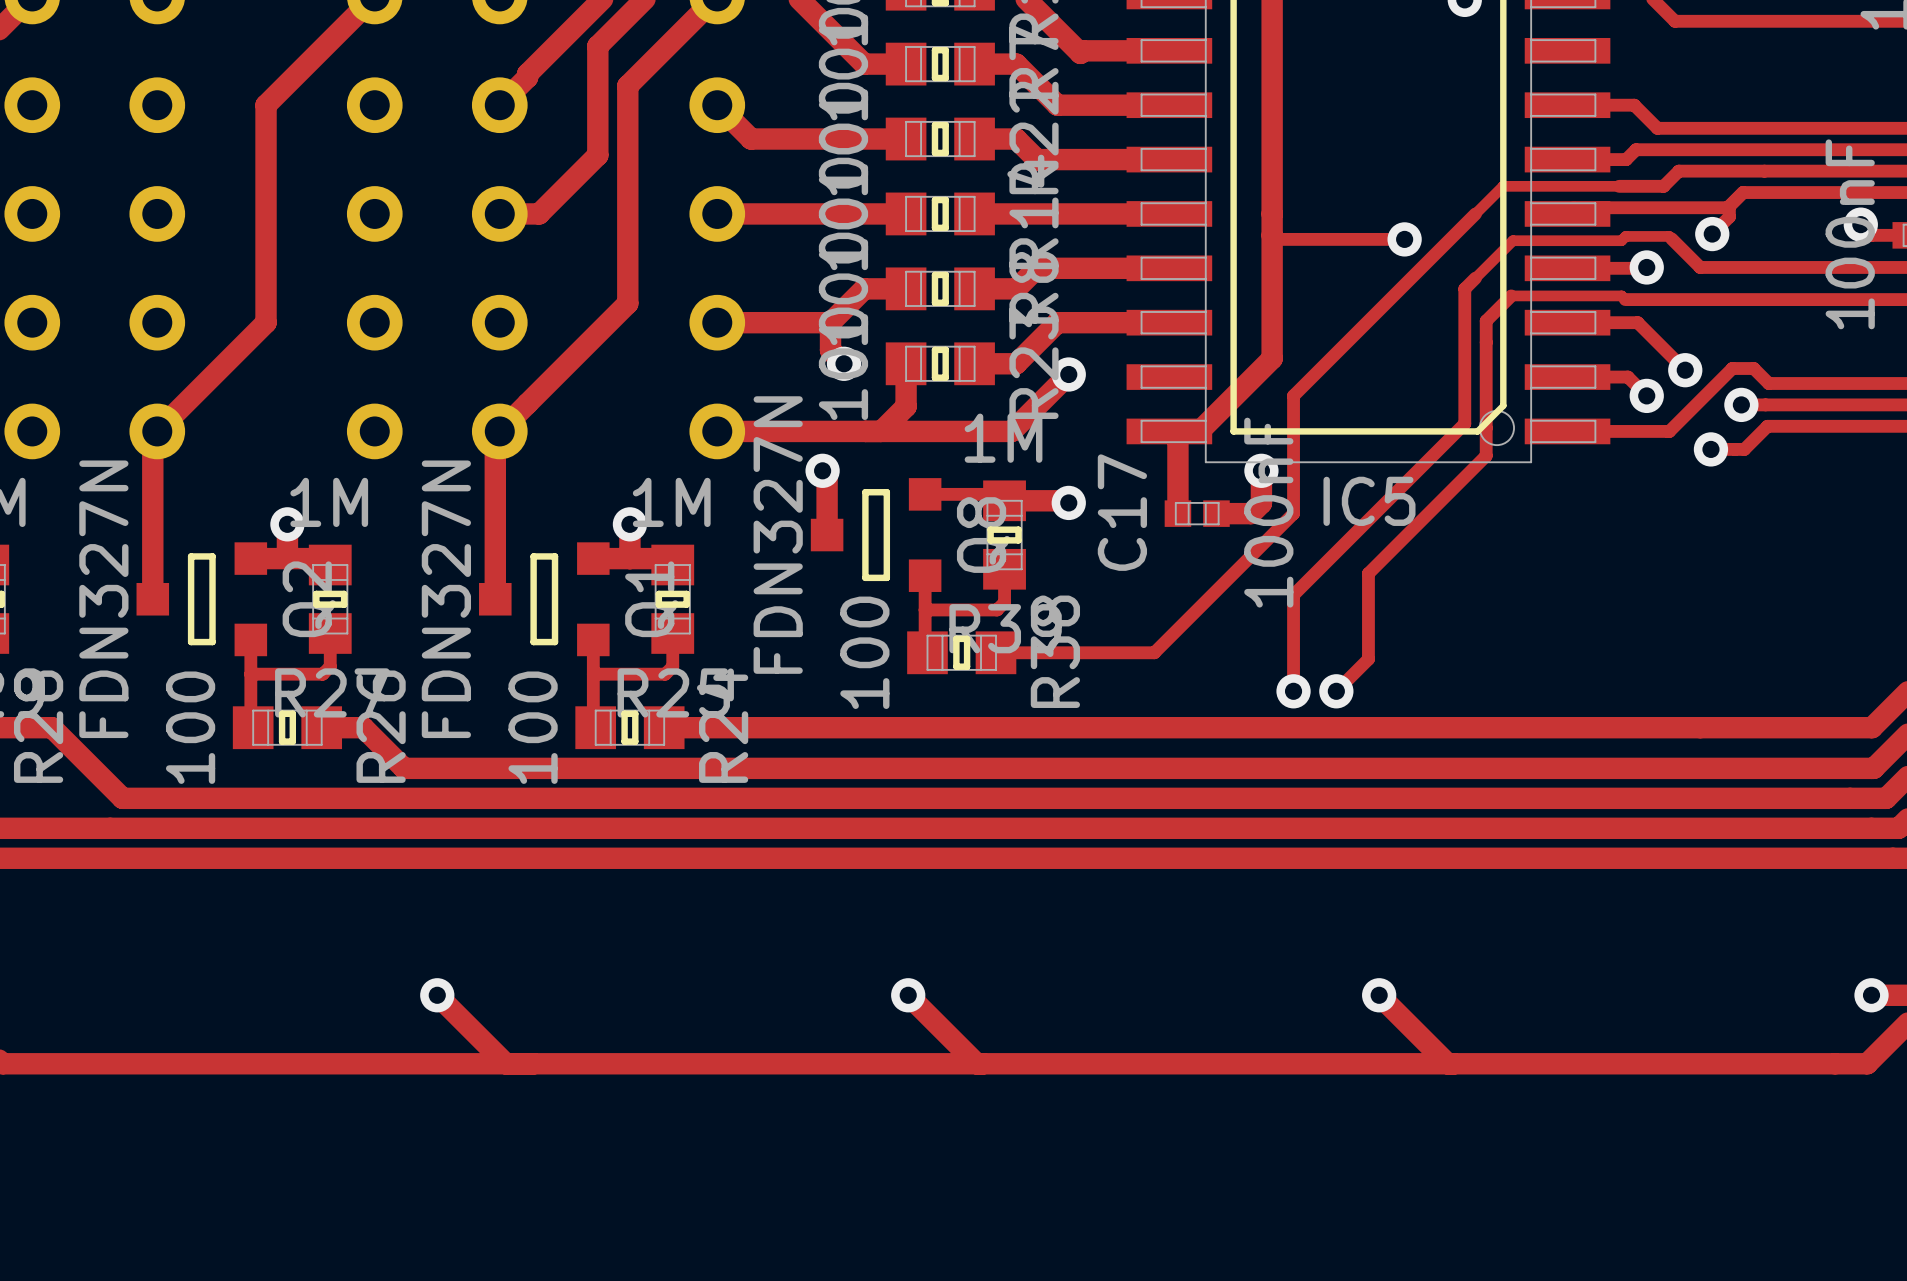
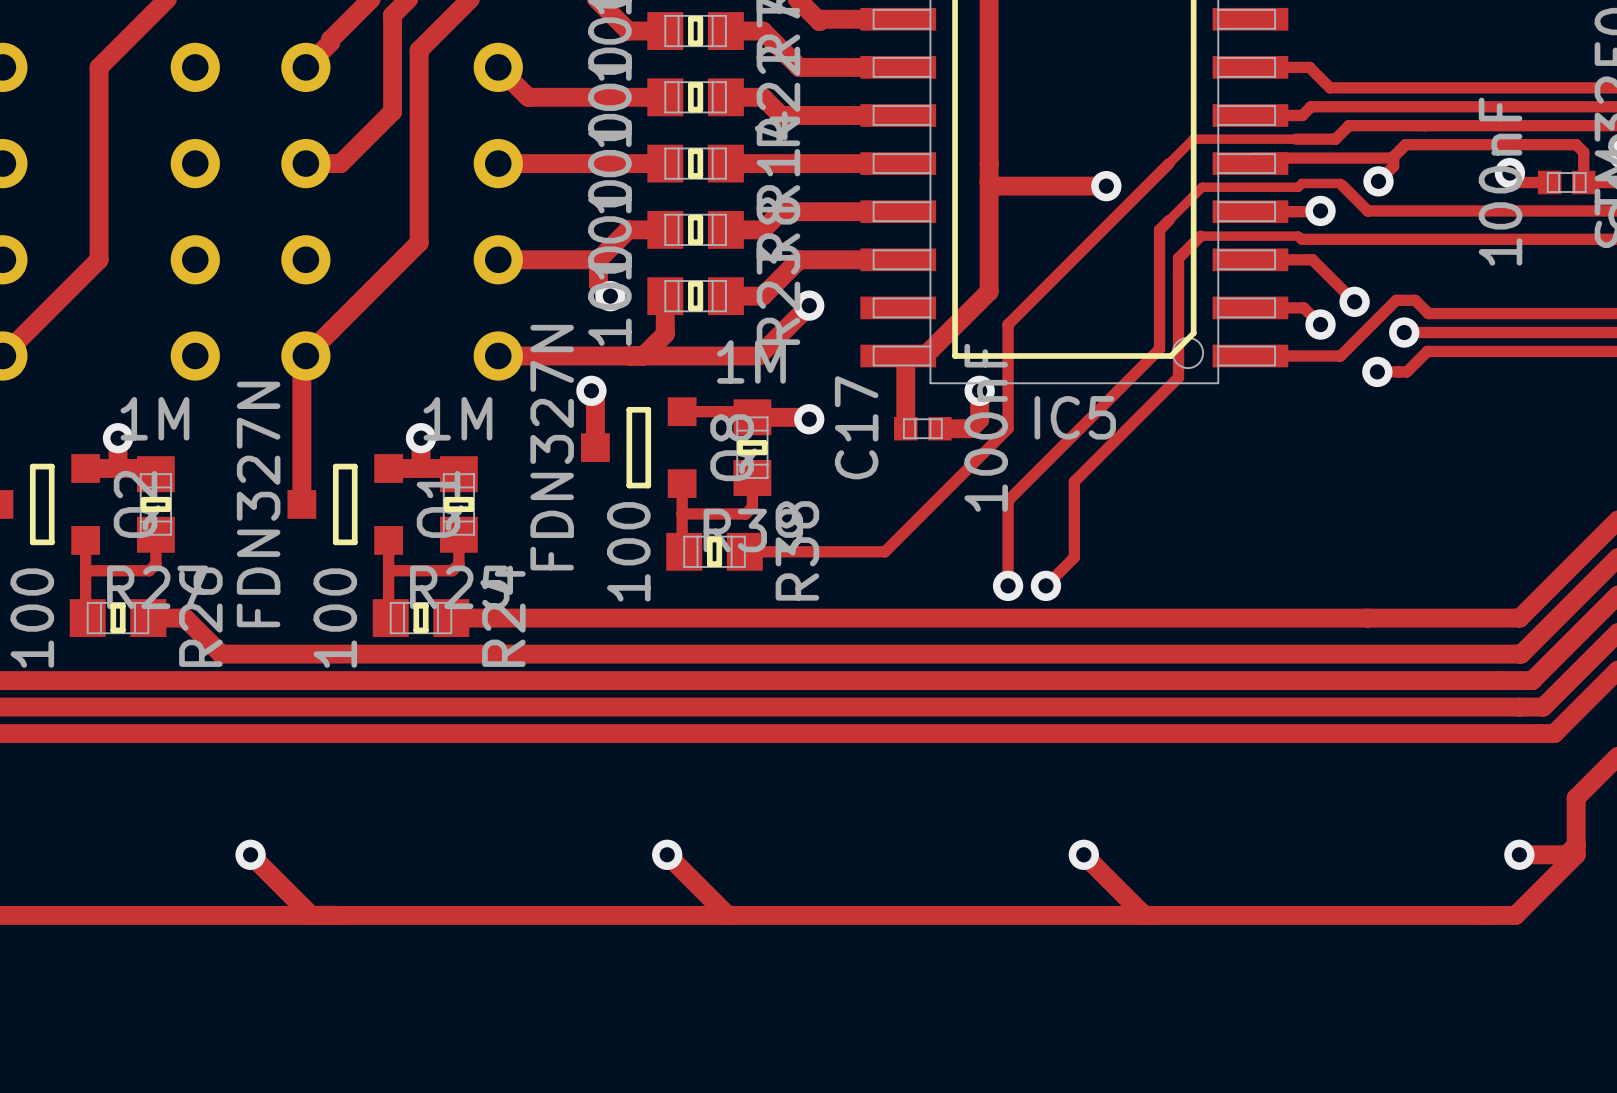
track width: thin (1272, 235) (1276, 239) (1404, 239) -> thick (989, 182) (992, 186) (1106, 186)

